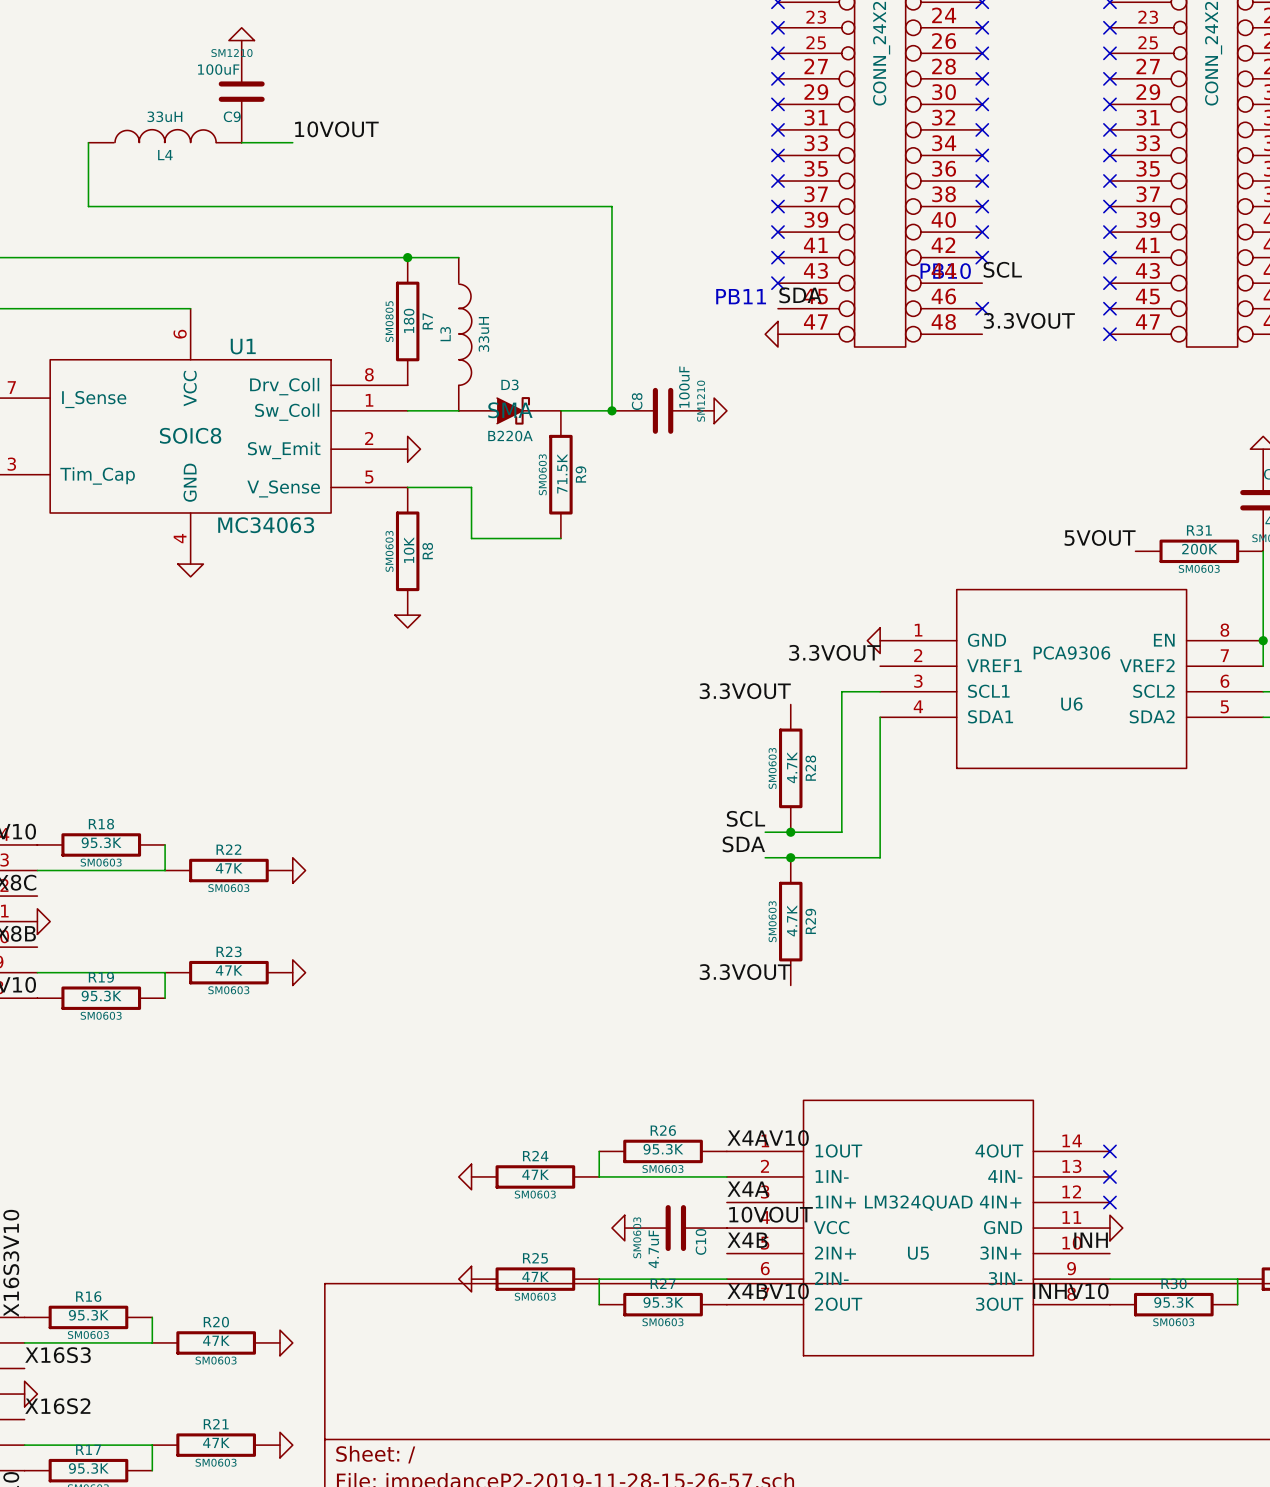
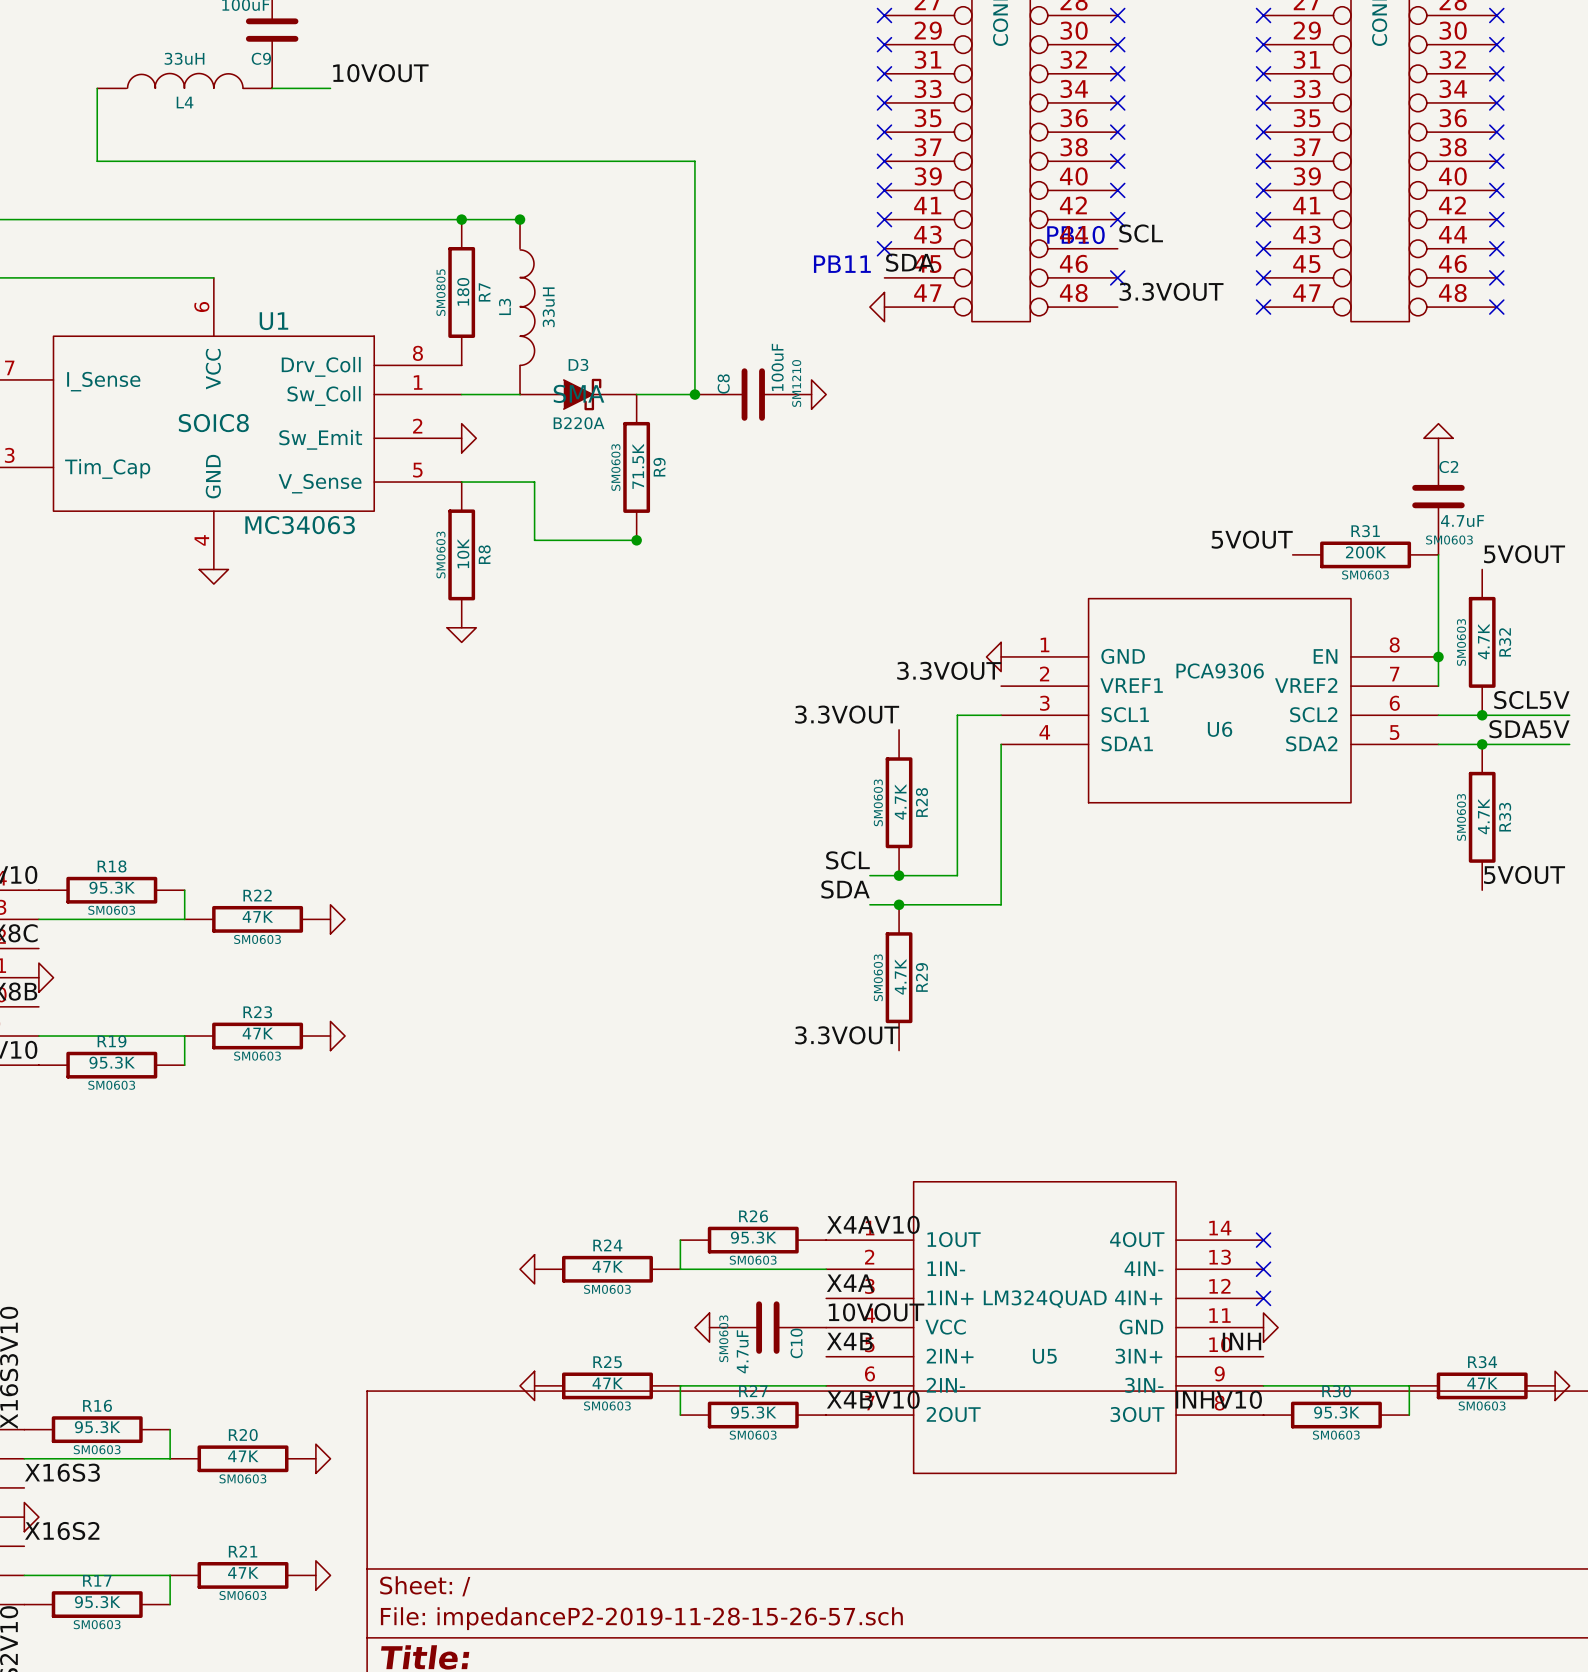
junction: none -> (520, 219)
junction: none -> (636, 540)

